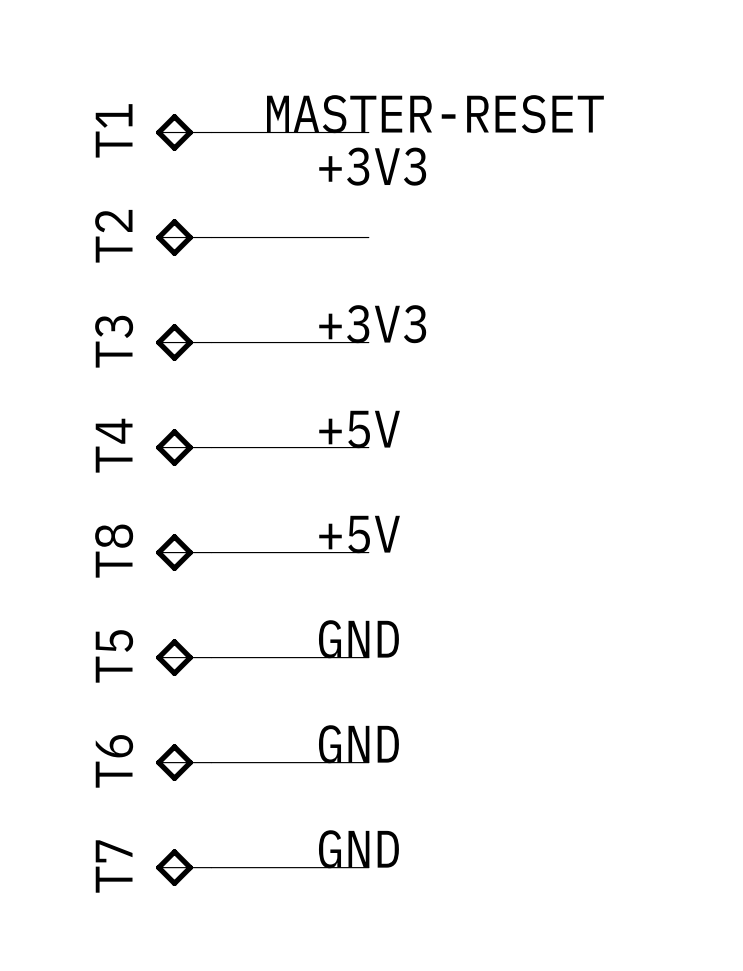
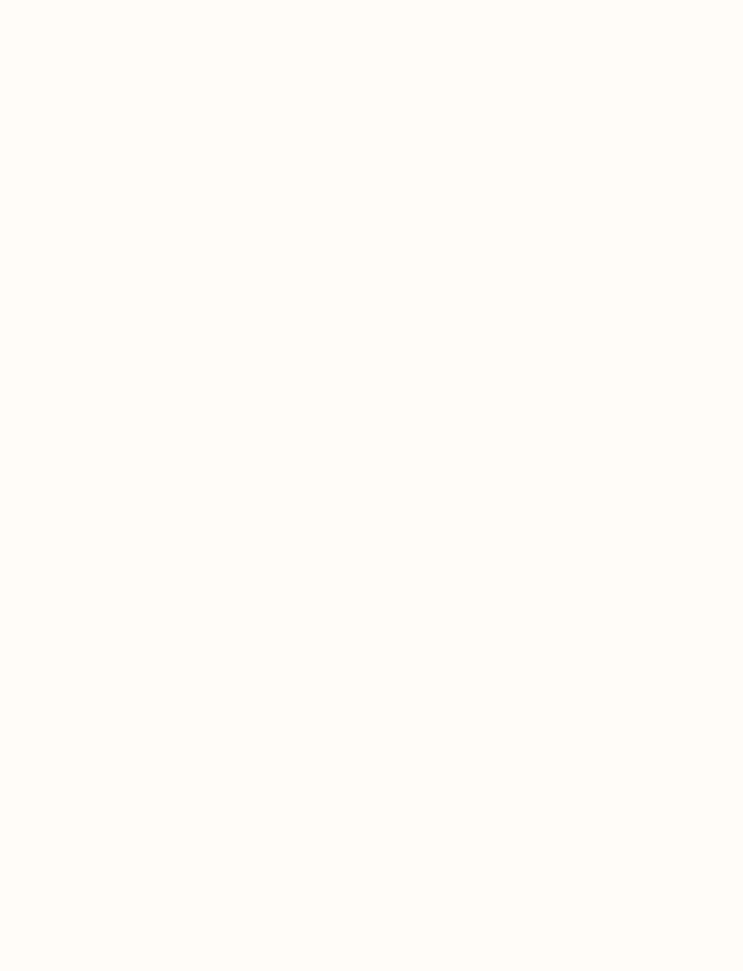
label: MASTER-RESET (435, 114) -> none
T1: (183, 132) -> none
wire: (211, 132) (368, 132) -> none
label: +3V3 (372, 166) -> none
T2: (183, 237) -> none
wire: (211, 237) (368, 237) -> none
label: +3V3 (372, 324) -> none
T3: (183, 342) -> none
wire: (211, 342) (368, 342) -> none
label: +5V (359, 429) -> none
T4: (183, 447) -> none
wire: (211, 447) (368, 447) -> none
label: +5V (359, 534) -> none
T8: (183, 552) -> none
wire: (211, 552) (368, 552) -> none
label: GND (358, 639) -> none
T5: (183, 657) -> none
wire: (211, 657) (368, 657) -> none
label: GND (358, 744) -> none
T6: (183, 762) -> none
wire: (211, 762) (368, 762) -> none
label: GND (358, 849) -> none
T7: (183, 867) -> none
wire: (211, 867) (368, 867) -> none

